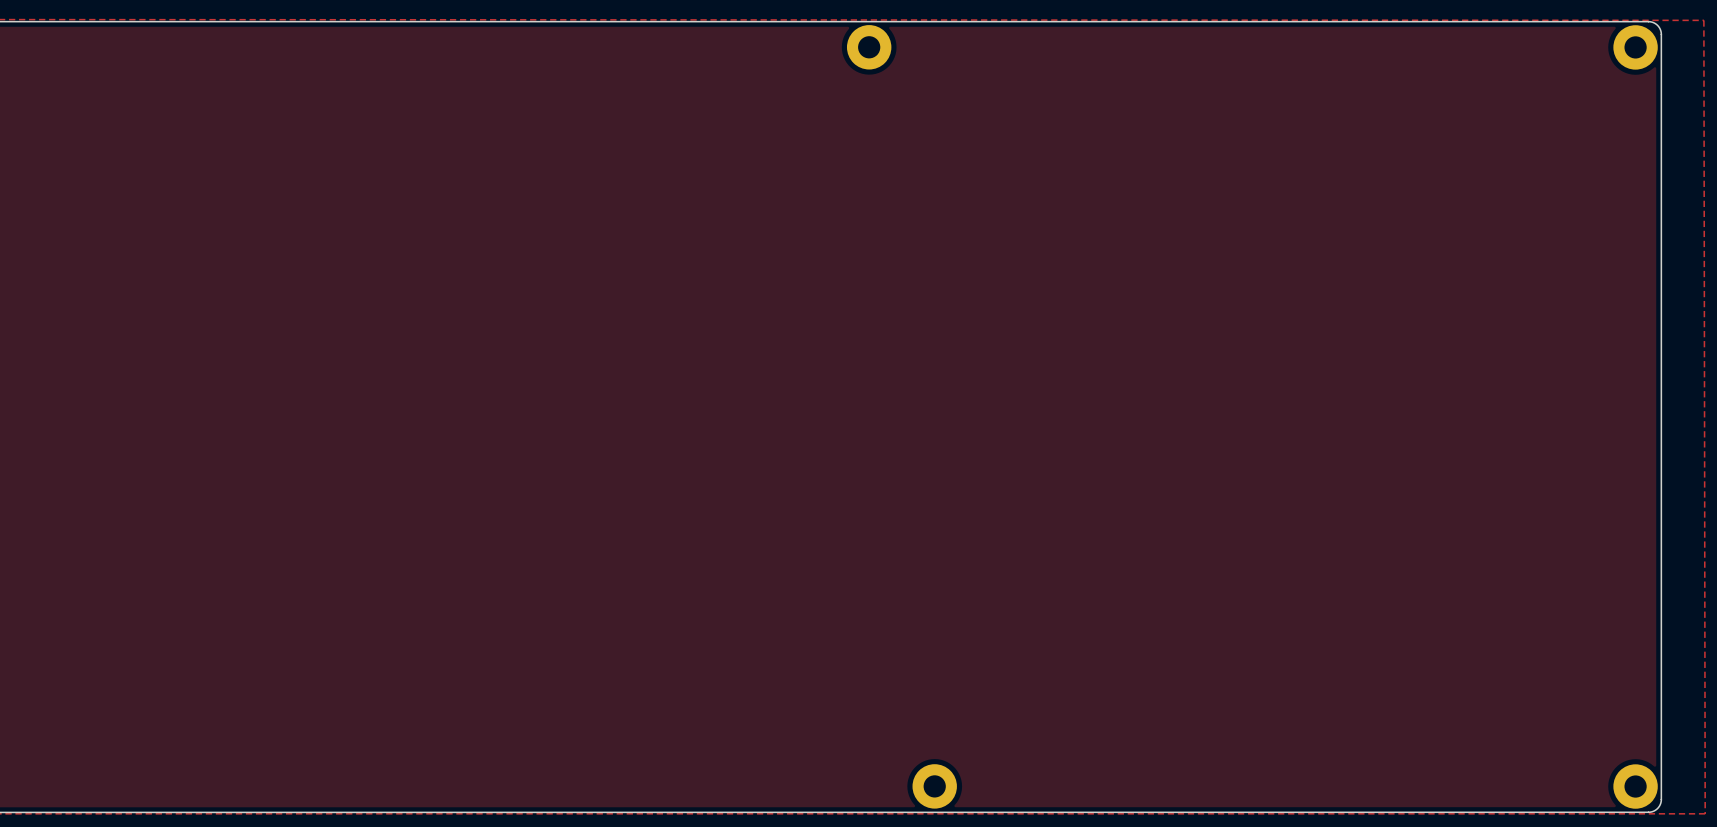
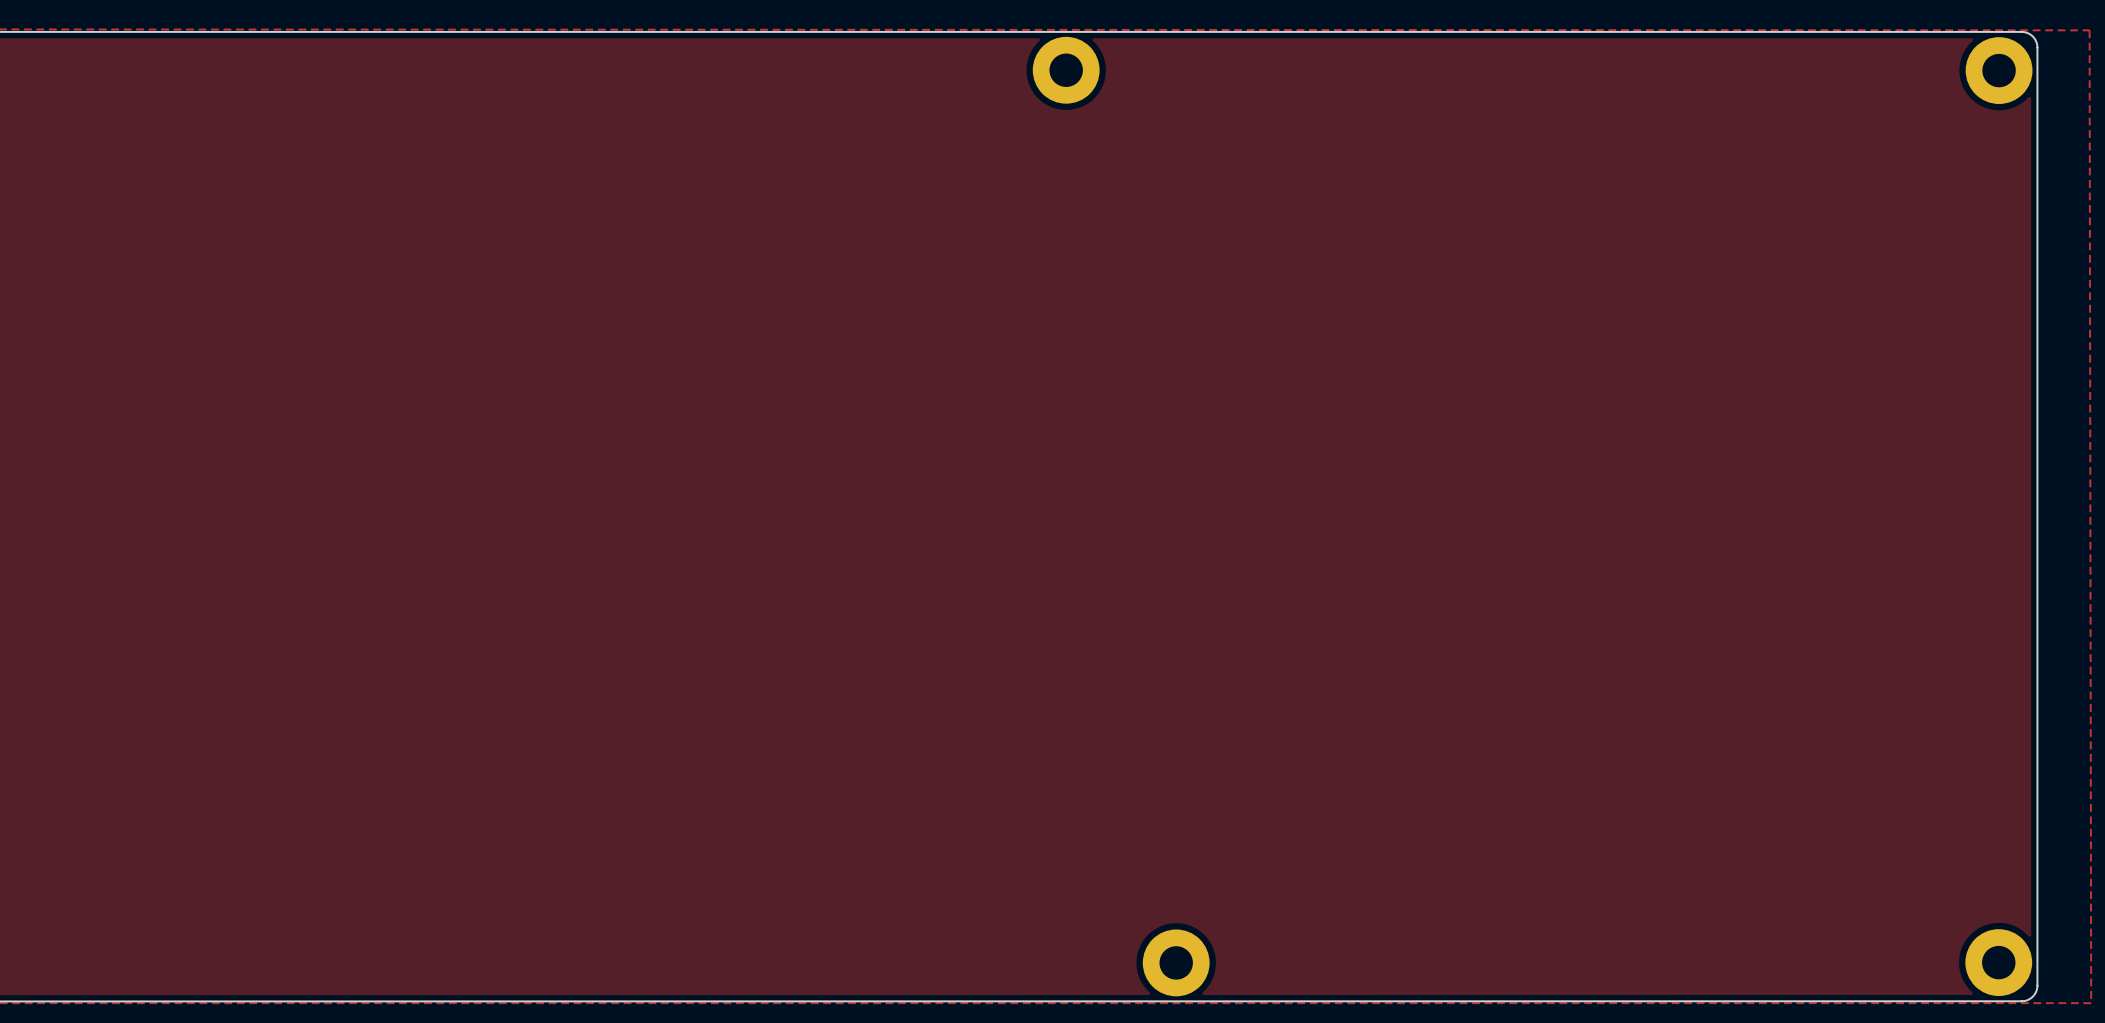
part footprint: [846, 25, 892, 70] -> [1032, 36, 1100, 104]
part footprint: [1613, 25, 1658, 70] -> [1965, 37, 2033, 104]
part footprint: [1613, 764, 1658, 809] -> [1965, 929, 2033, 997]
part: none -> (1176, 962)
part: (934, 786) -> none

